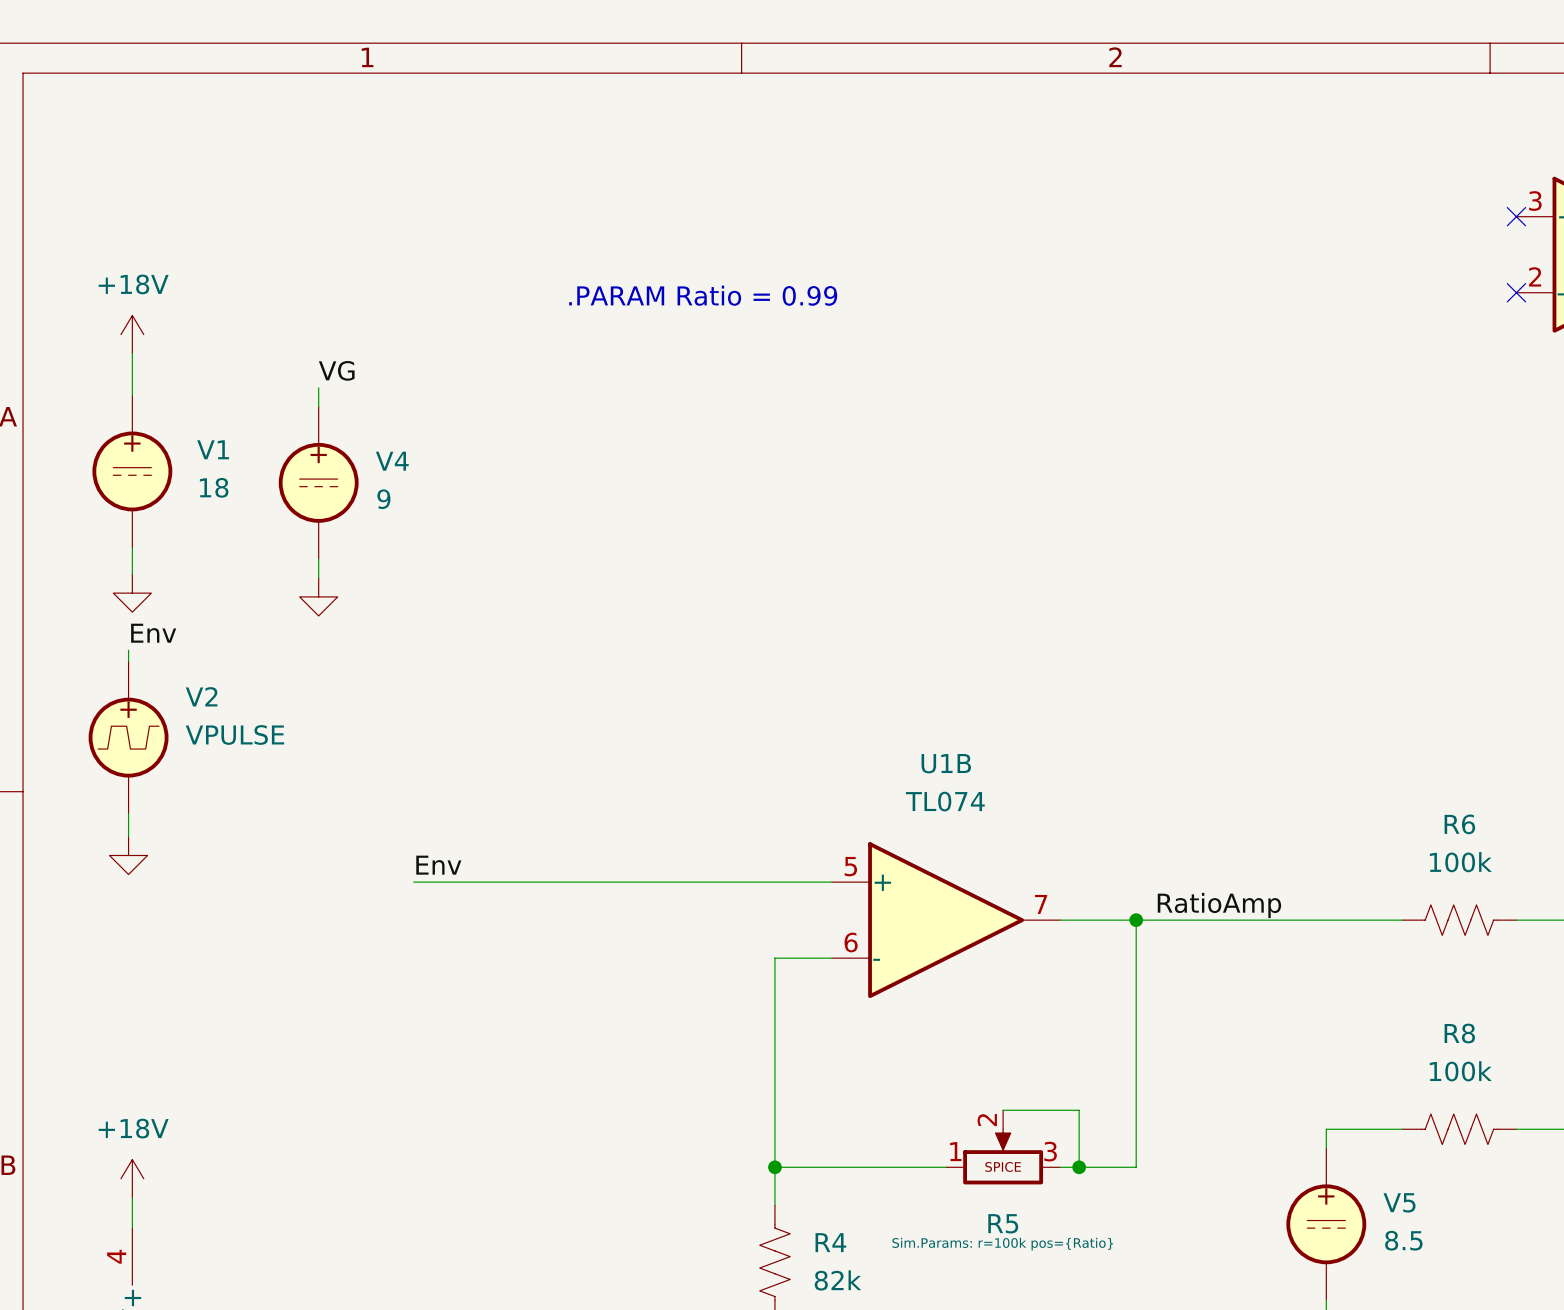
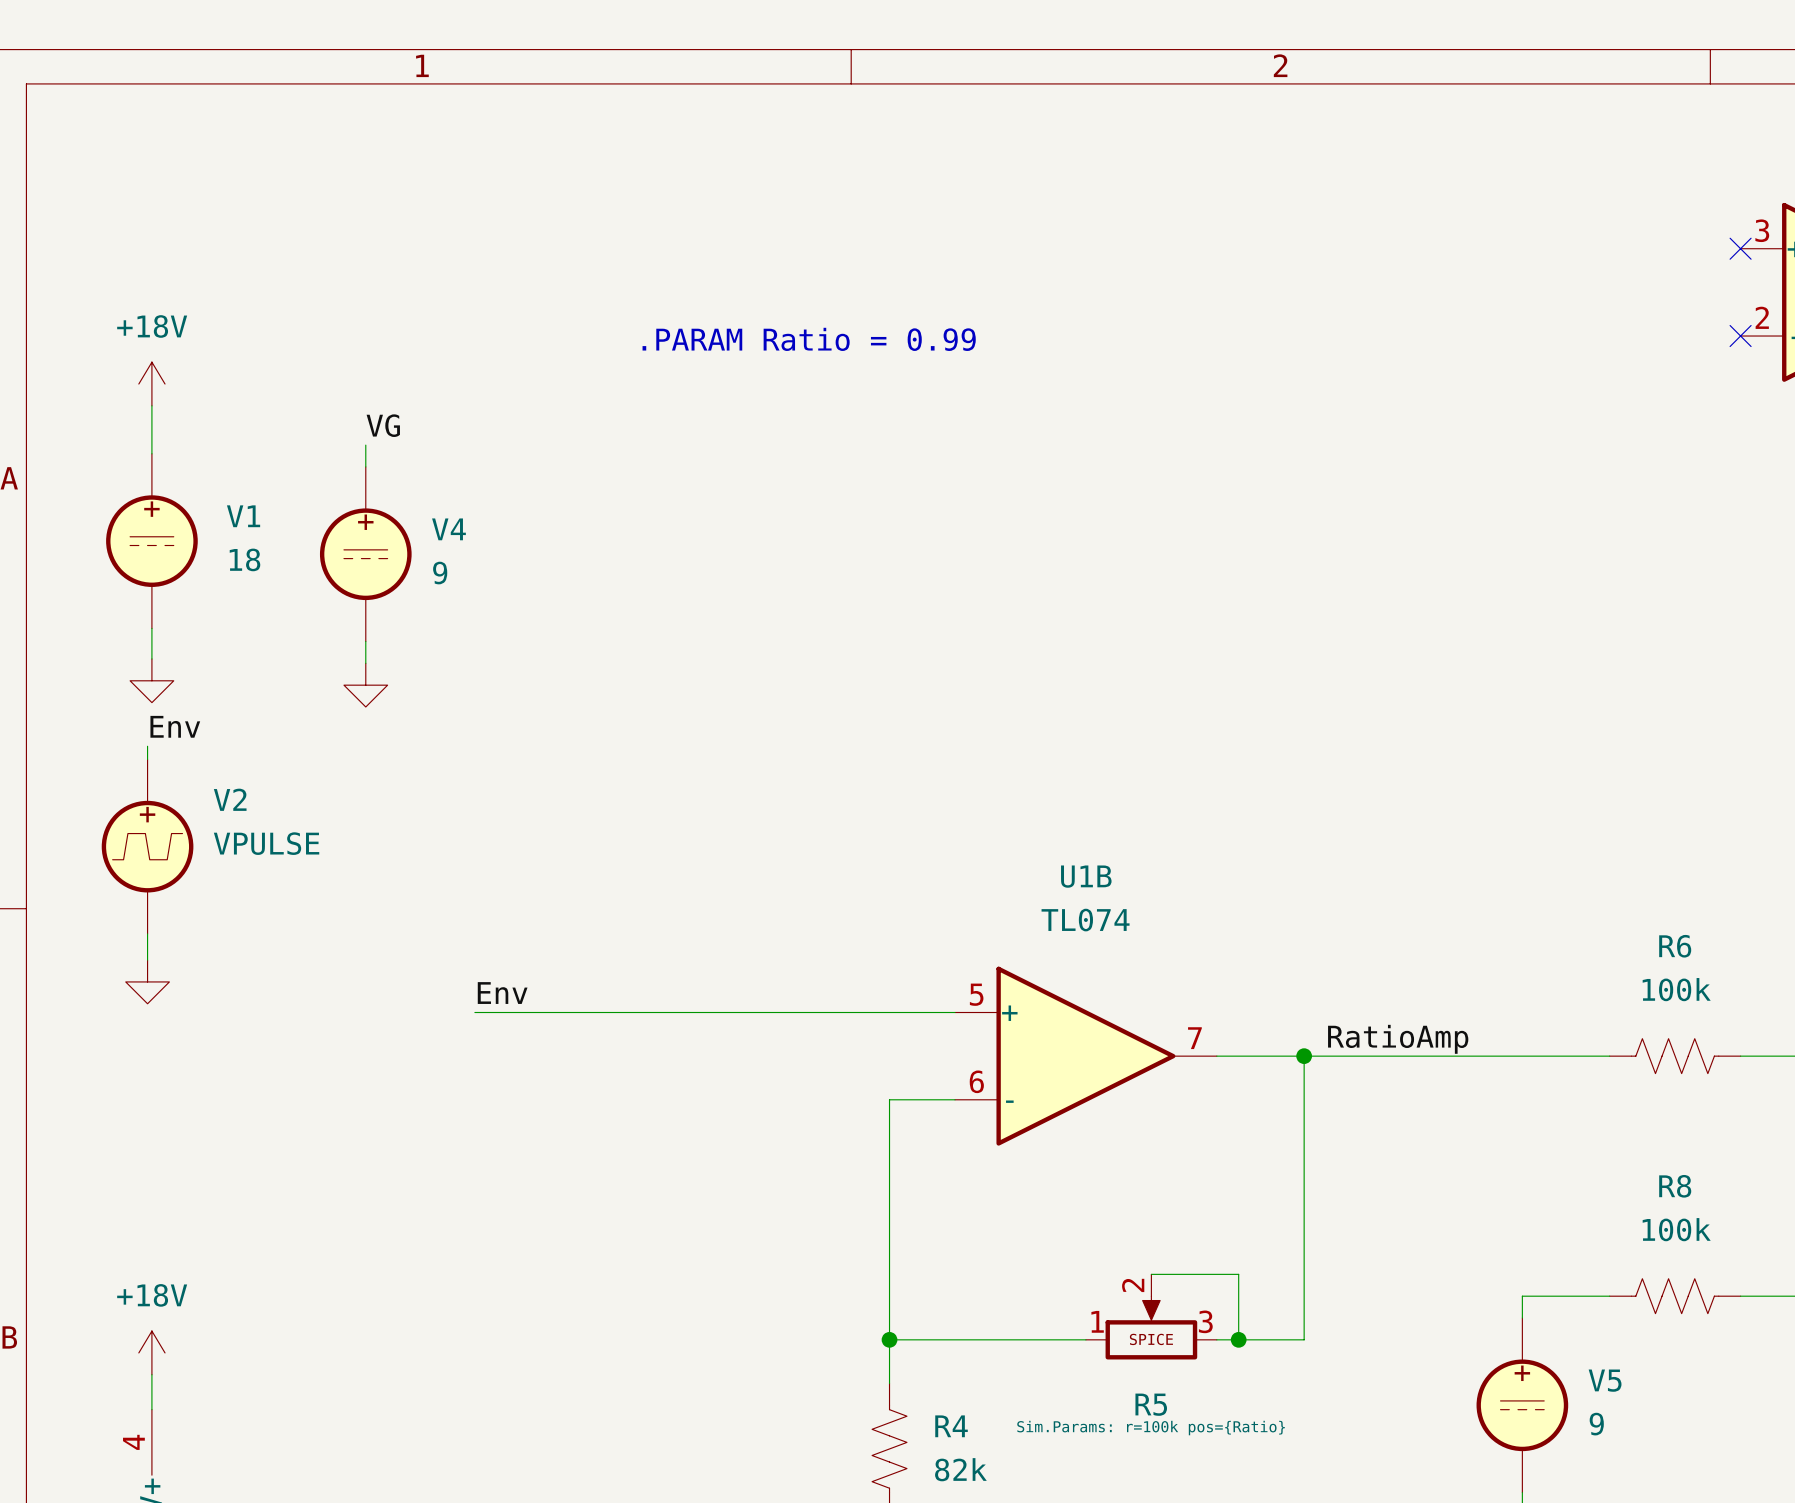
V5 value: 8.5 (1403, 1240) -> 9 (1596, 1424)

